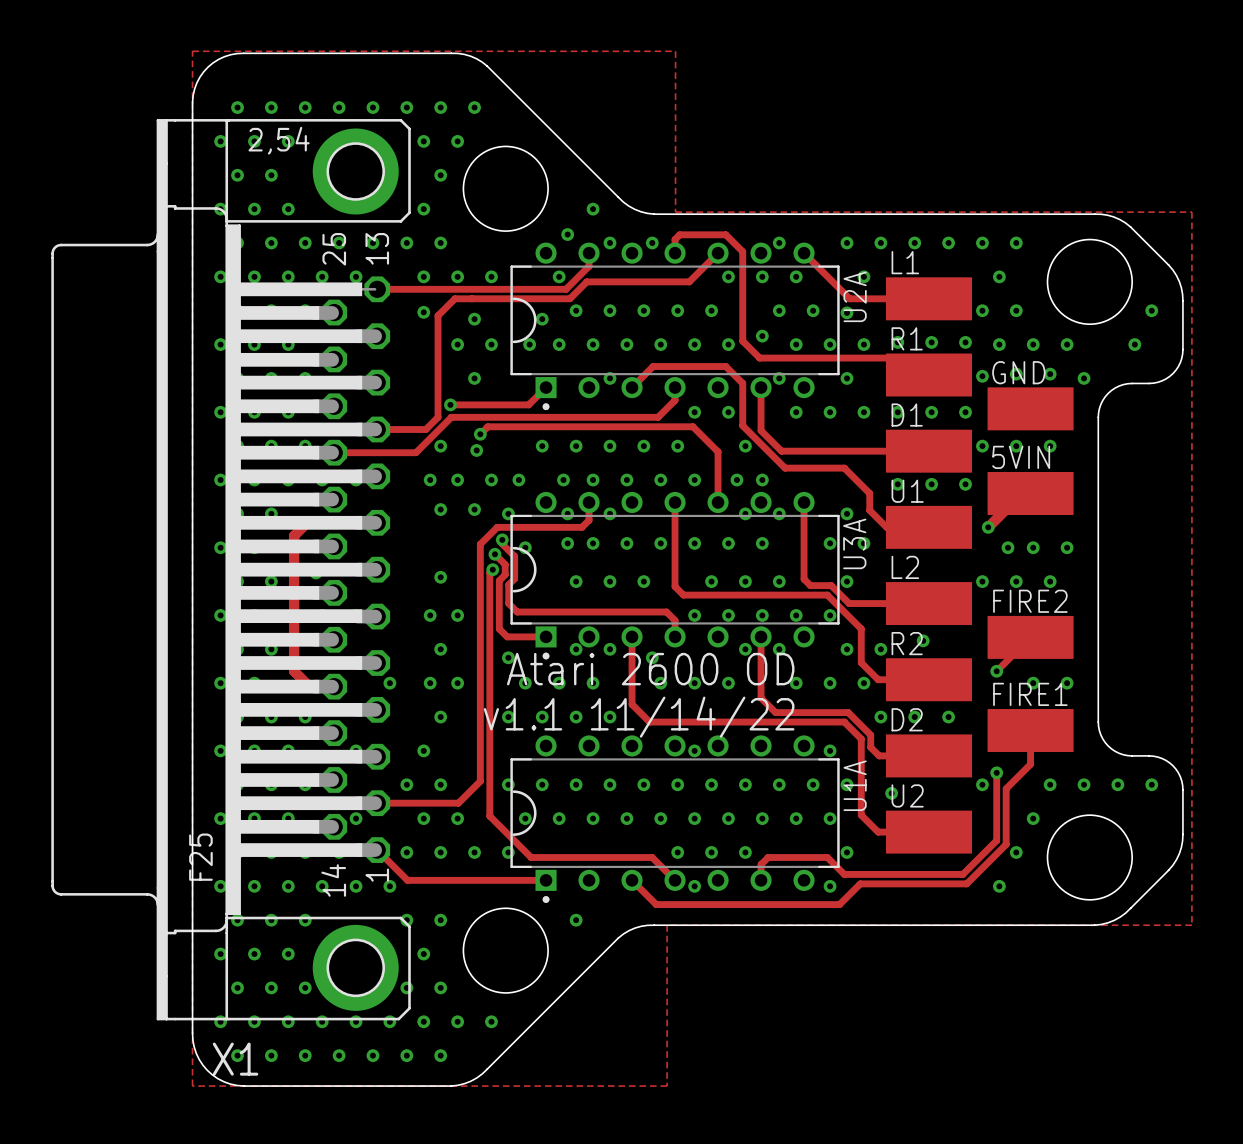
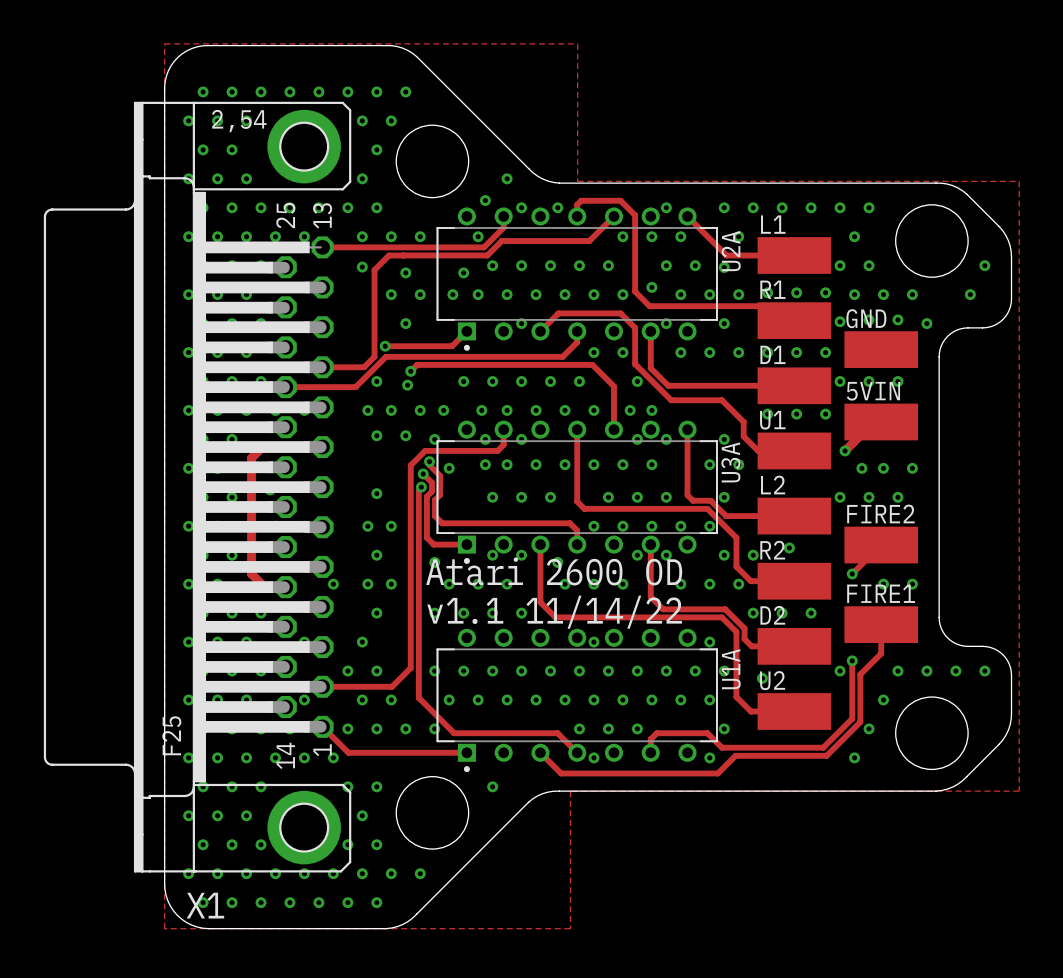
U2A footprint: [510, 242, 840, 411] -> [436, 207, 718, 351]
U3A footprint: [510, 491, 840, 660] -> [436, 420, 718, 564]
U1A footprint: [510, 735, 840, 903] -> [436, 628, 718, 773]

